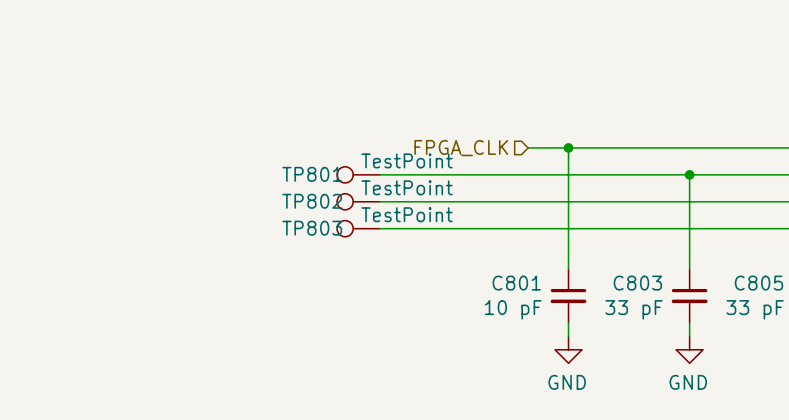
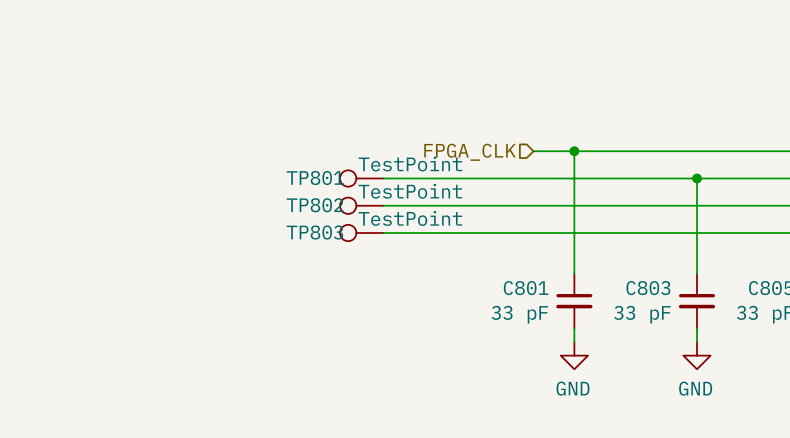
C801 value: 10 pF (513, 309) -> 33 pF (519, 314)

